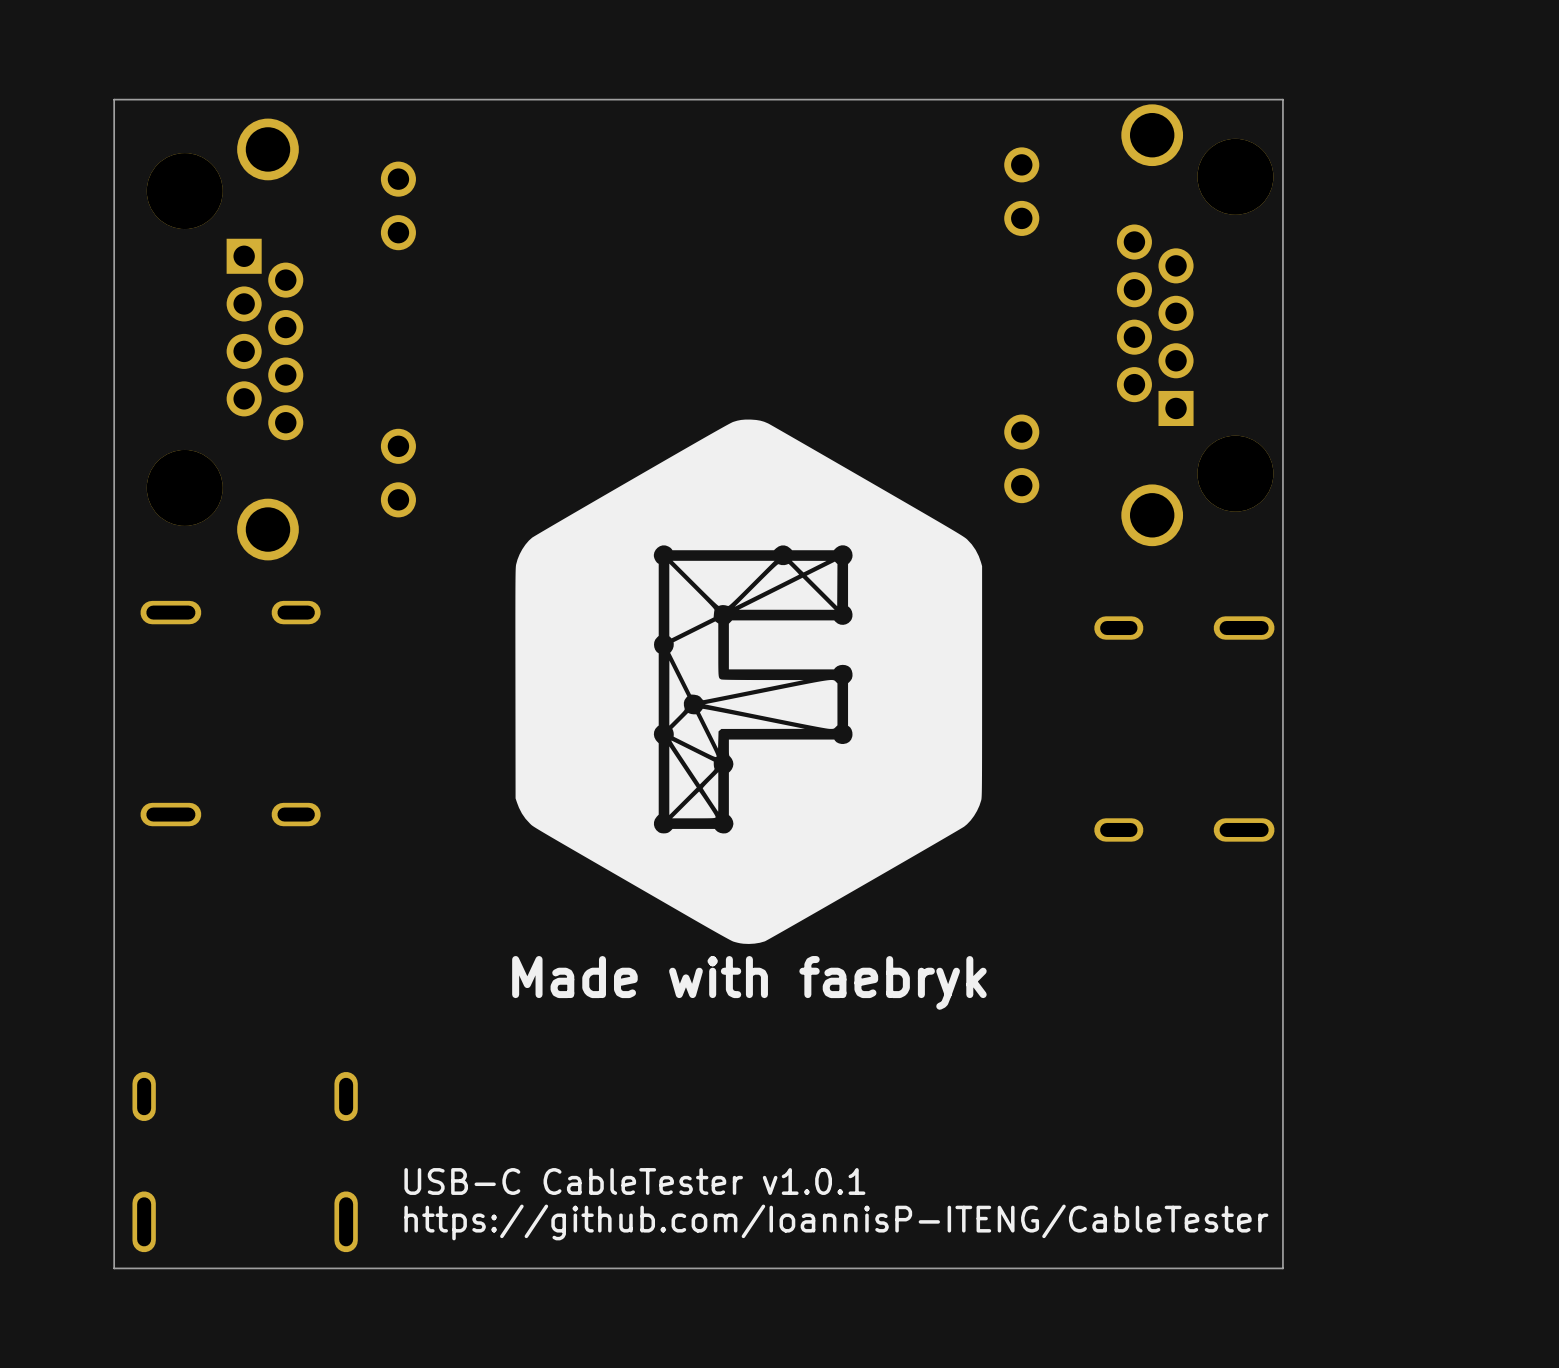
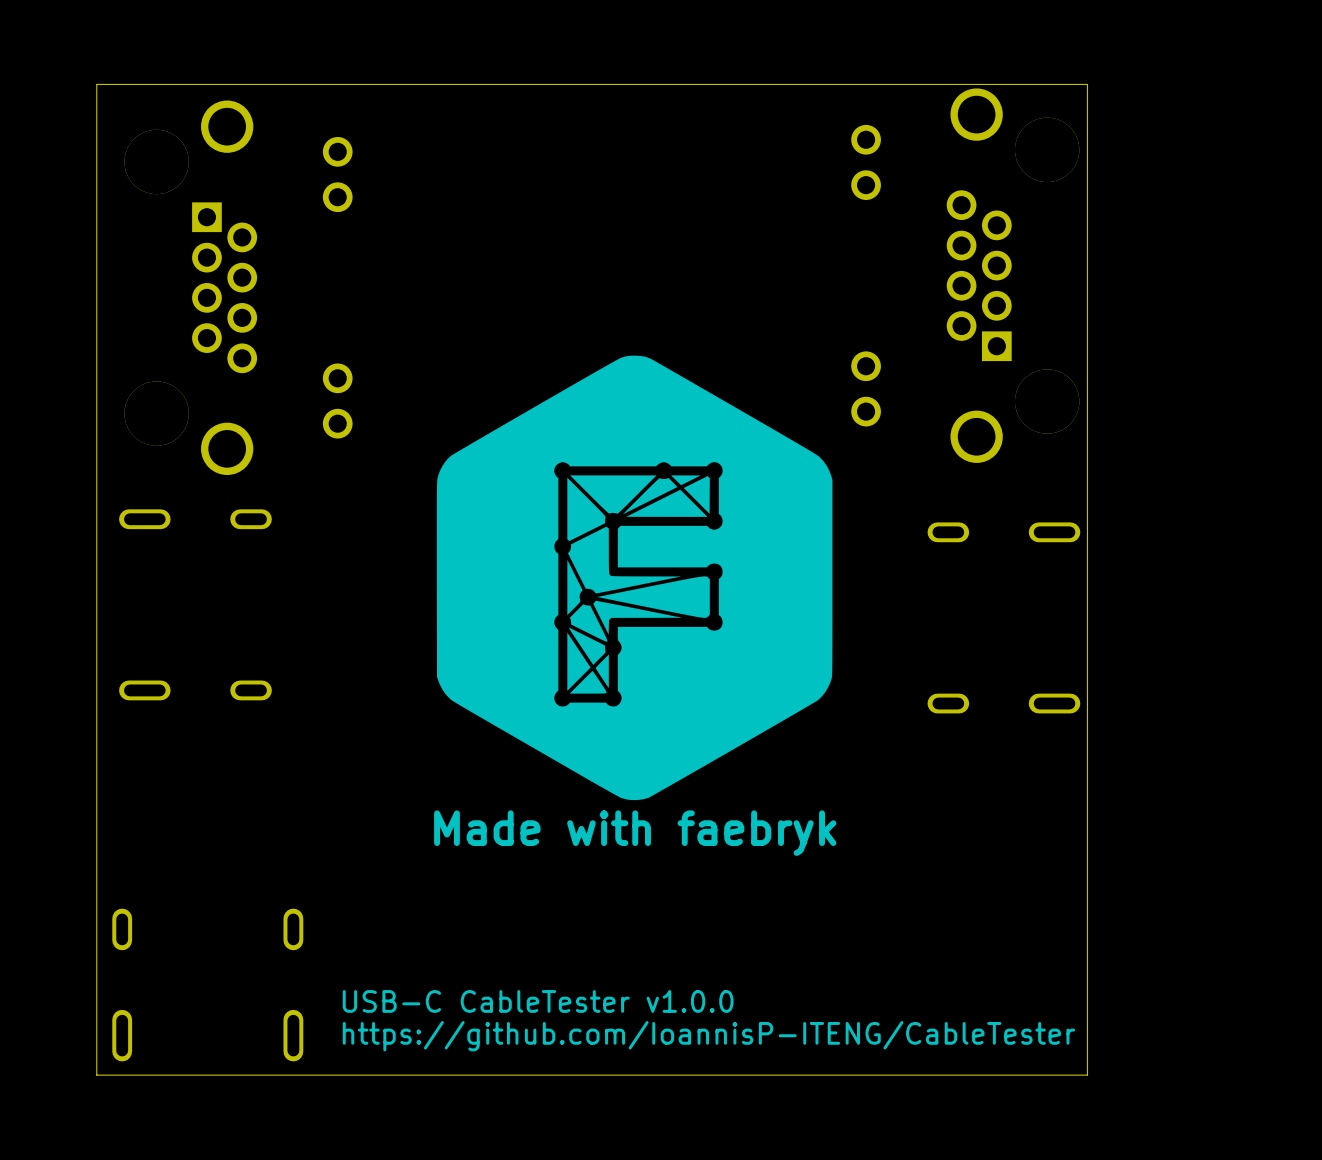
text: USB-C CableTester v1.0.1 (634, 1181) -> USB-C CableTester v1.0.0 (538, 1001)

